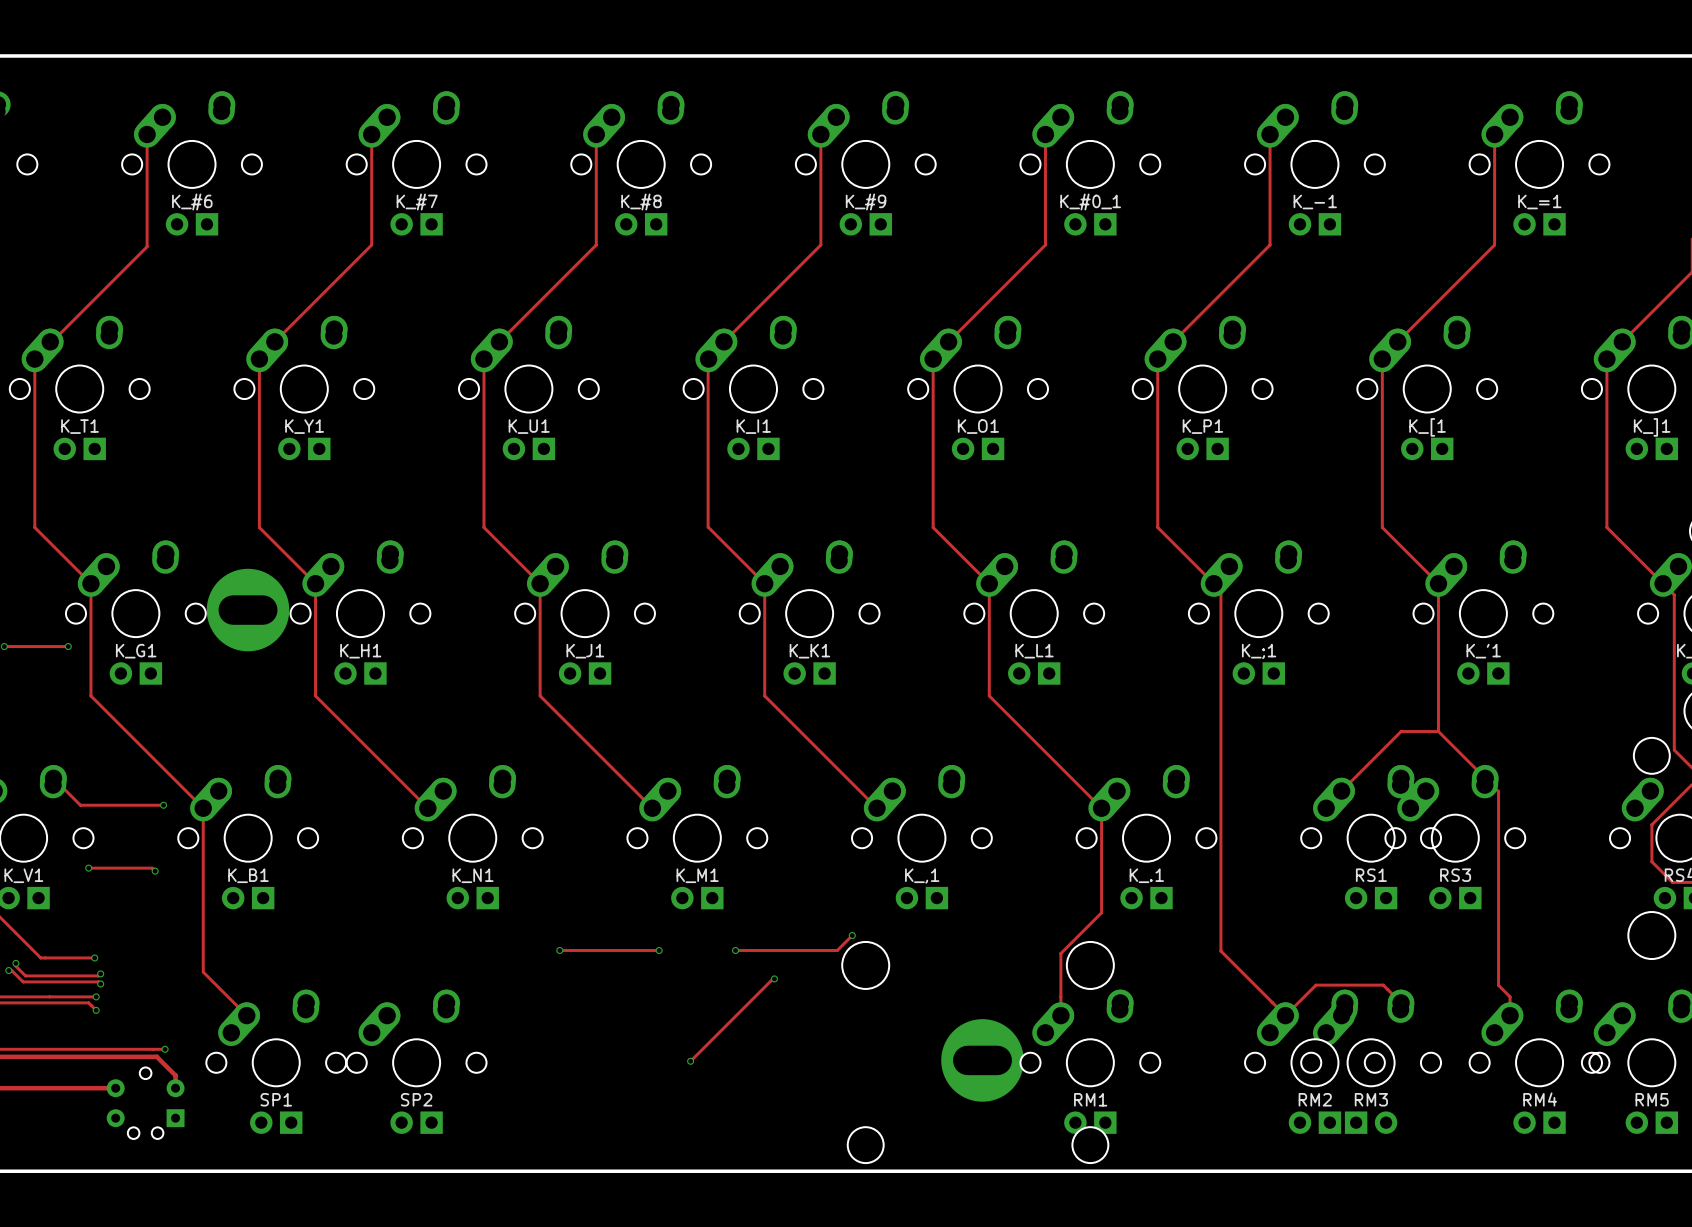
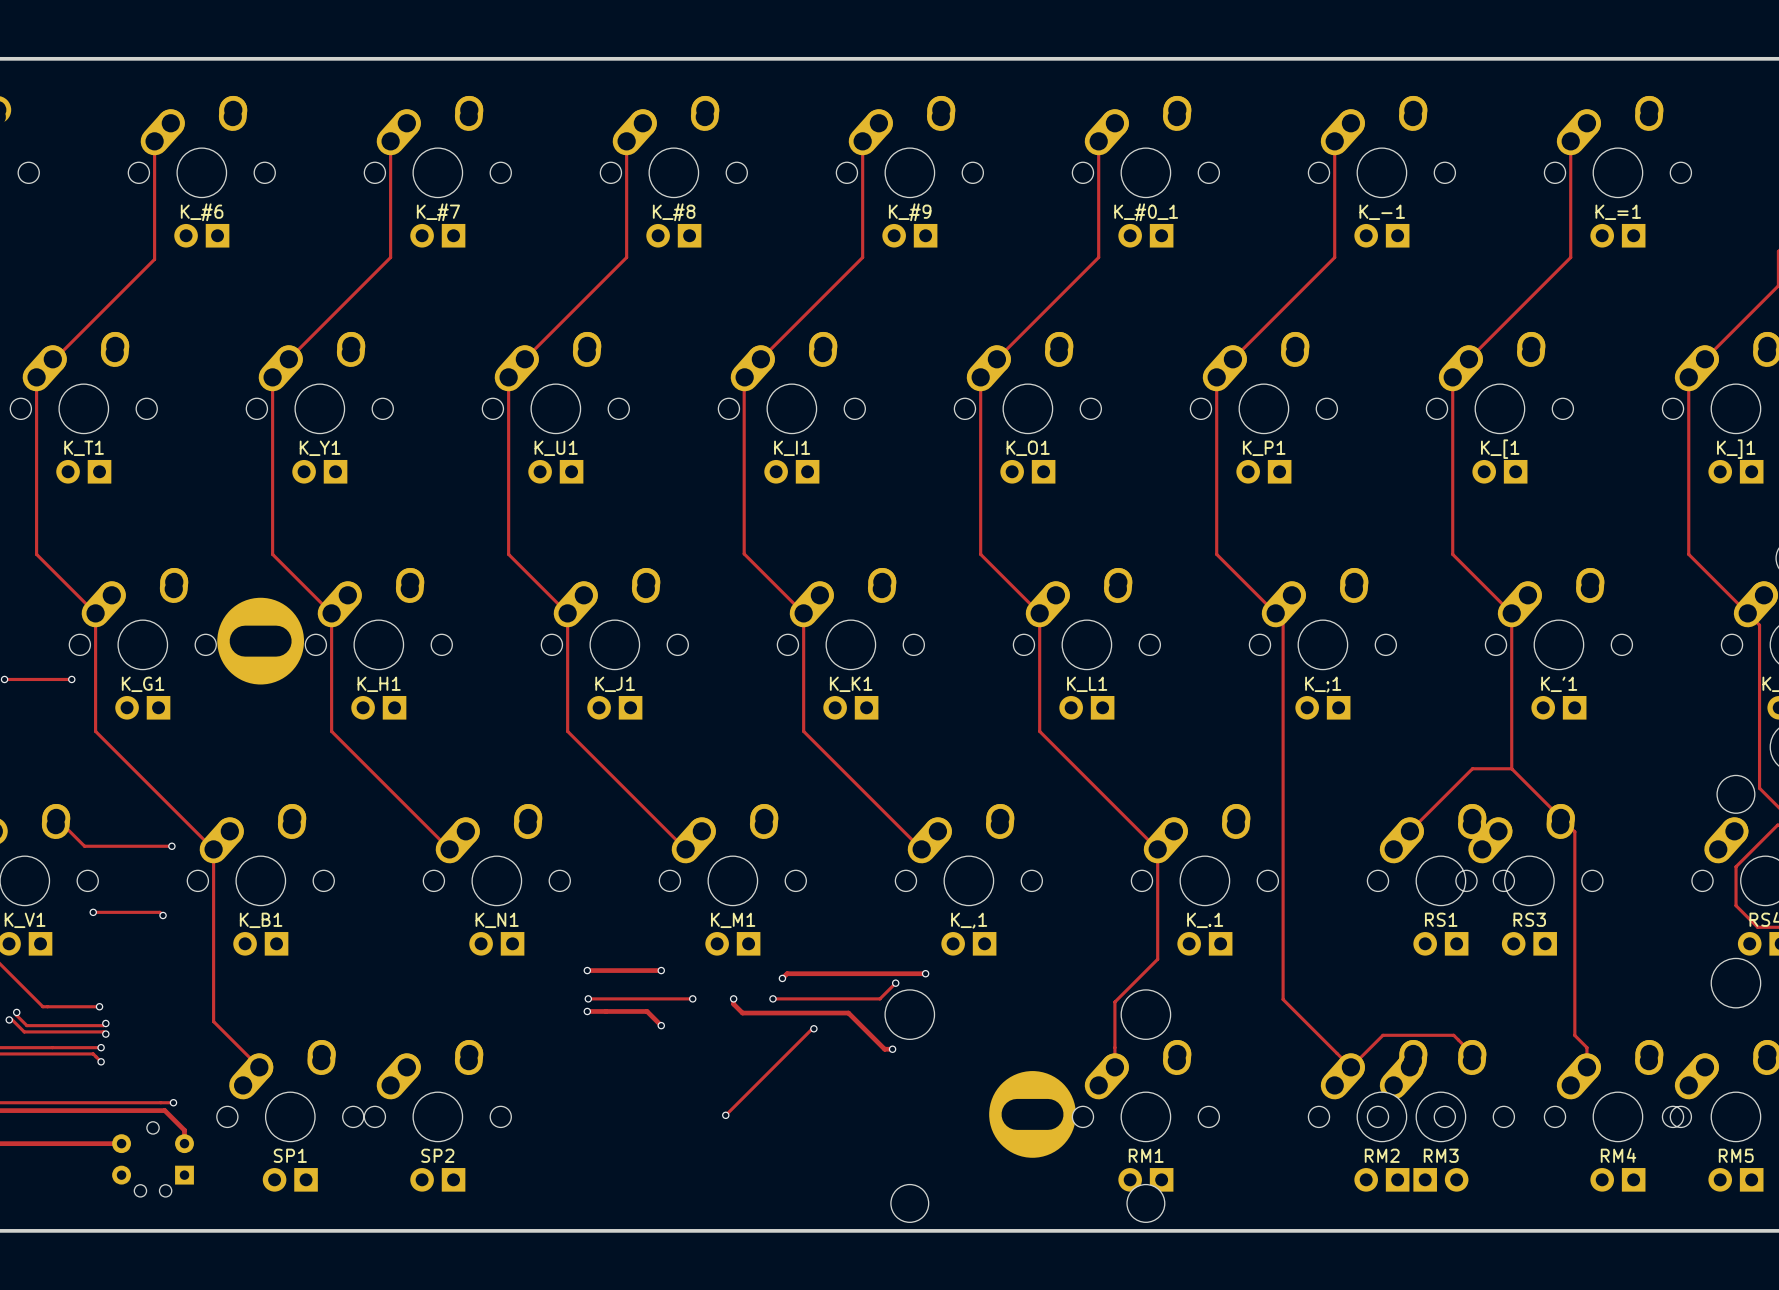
track: none -> (587, 970) (661, 970)
via: none -> (587, 970)
via: none -> (661, 970)
track: none -> (925, 973) (787, 973) (782, 978)
via: none -> (925, 973)
via: none -> (782, 978)
track: none -> (733, 998) (733, 1004) (742, 1013) (848, 1013) (884, 1049) (892, 1049)
via: none -> (733, 998)
track: none -> (587, 1011) (647, 1011) (661, 1025)
via: none -> (587, 1011)
via: none -> (661, 1025)
via: none -> (892, 1049)

